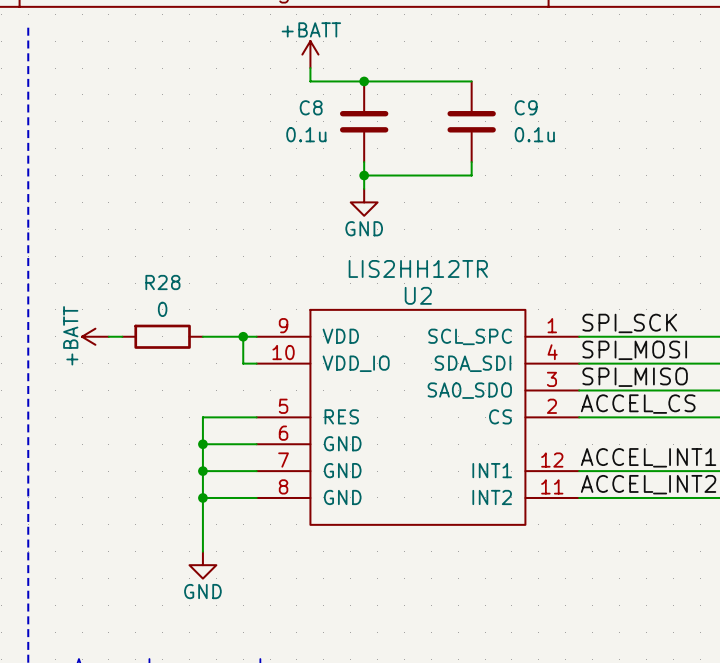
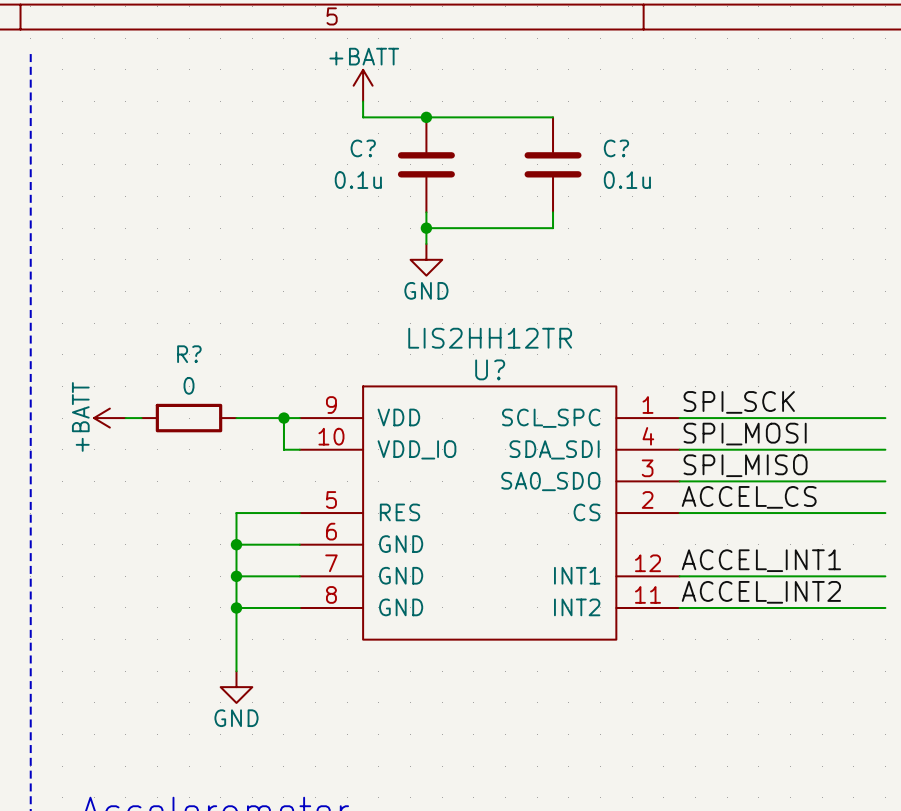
C8 name: C8 (311, 107) -> C? (363, 148)
C9 name: C9 (526, 107) -> C? (616, 148)
R28 name: R28 (162, 282) -> R? (189, 354)
U2 name: U2 (418, 295) -> U? (490, 369)

